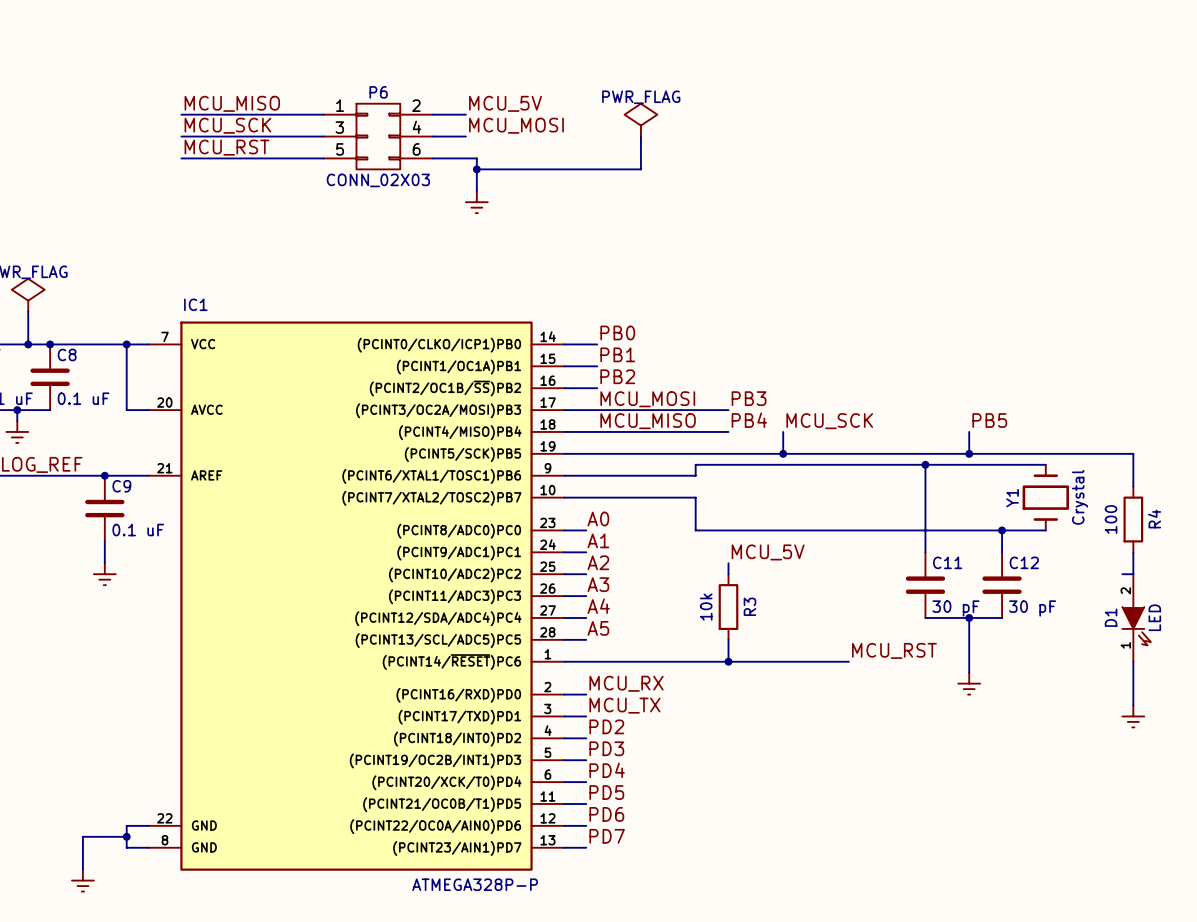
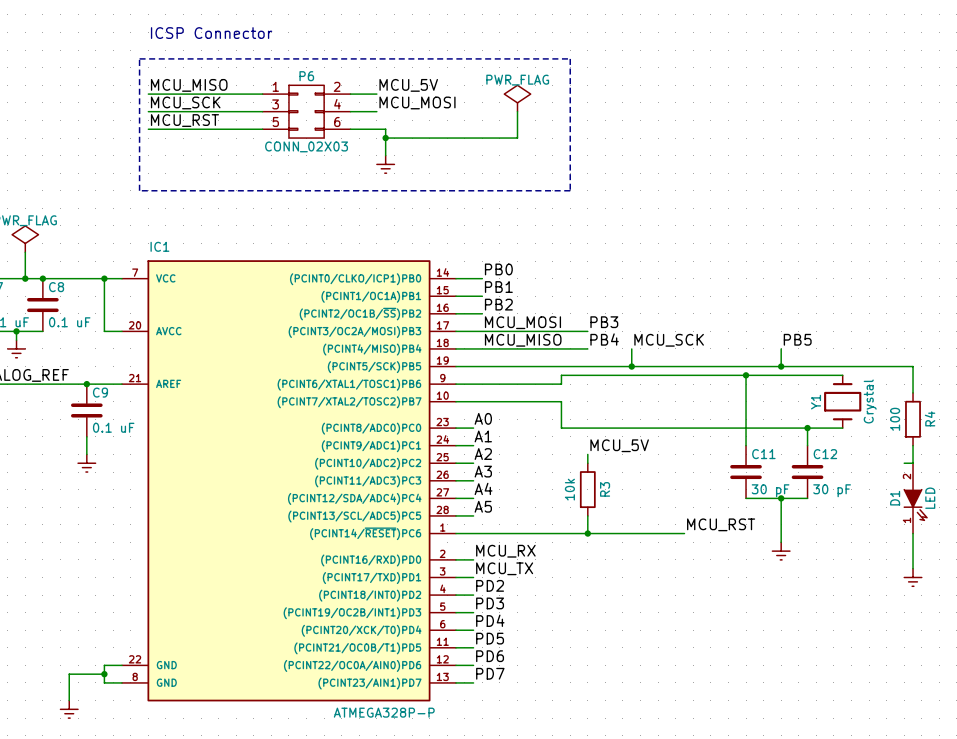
text: none -> ICSP Connector (211, 33)
line: none -> (139, 58) (570, 58) (570, 190) (139, 190) (139, 58)

